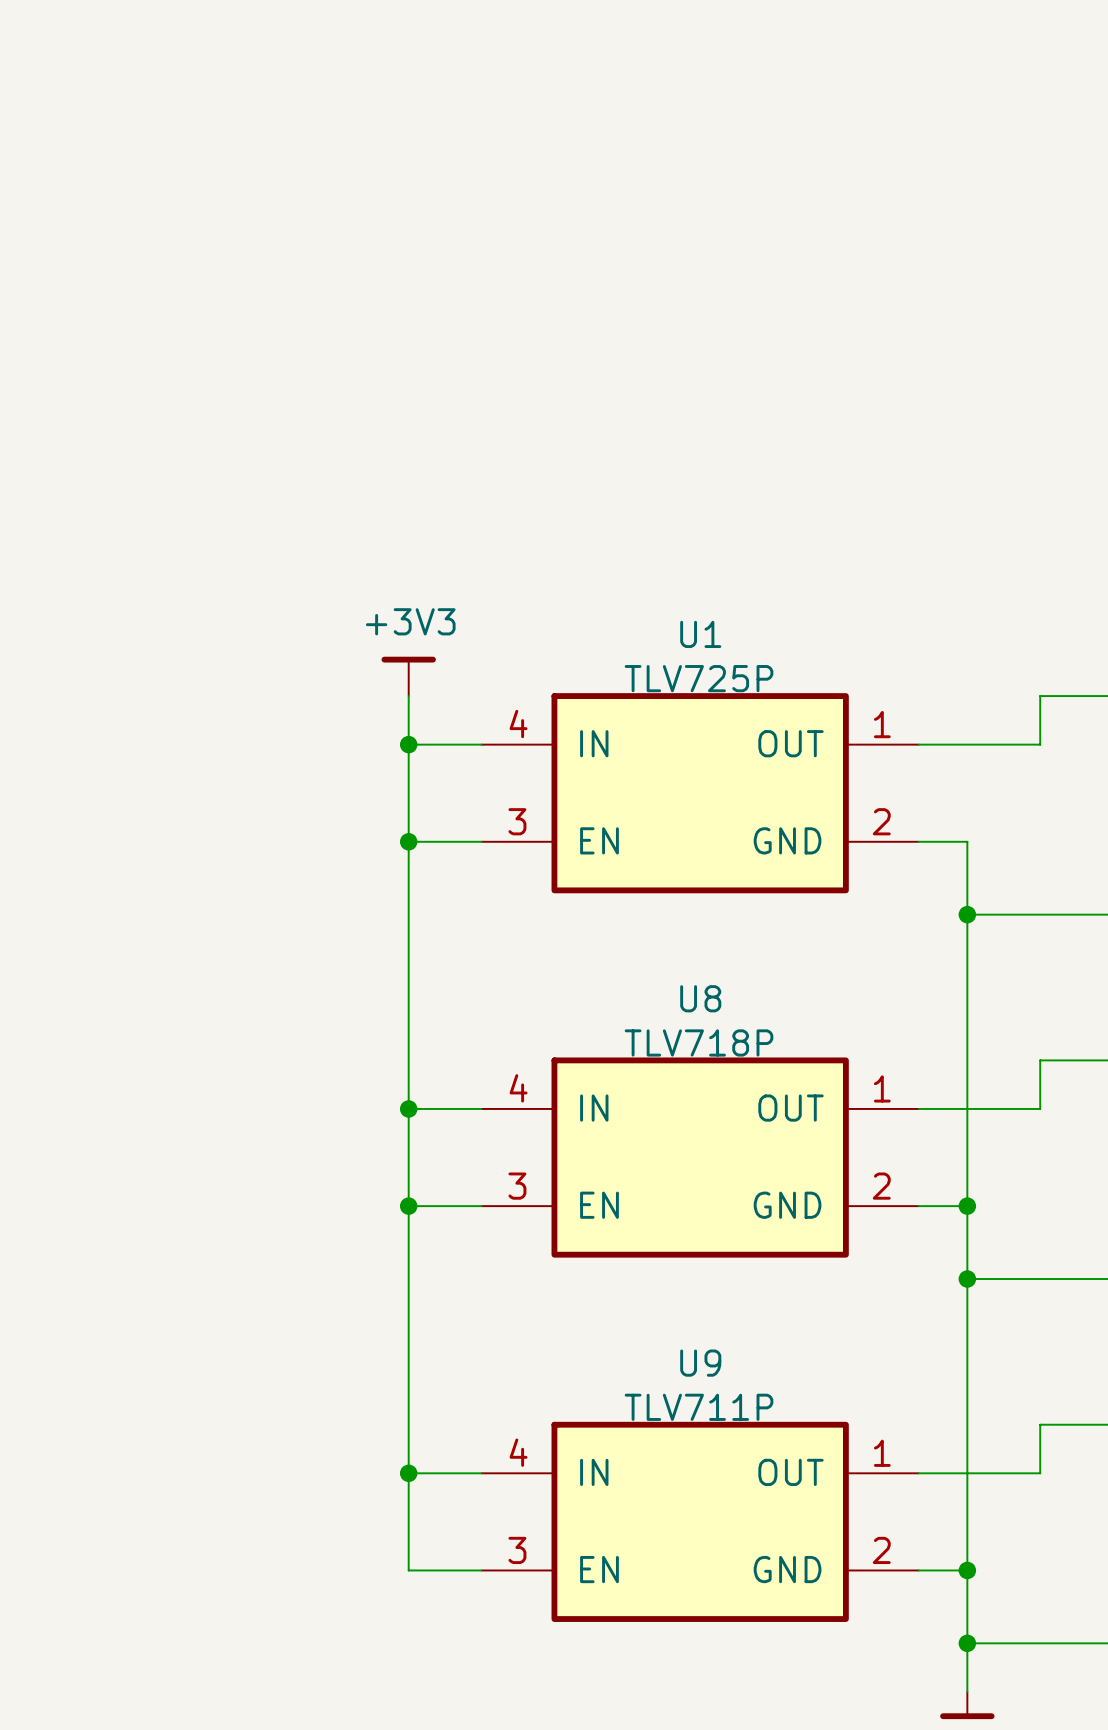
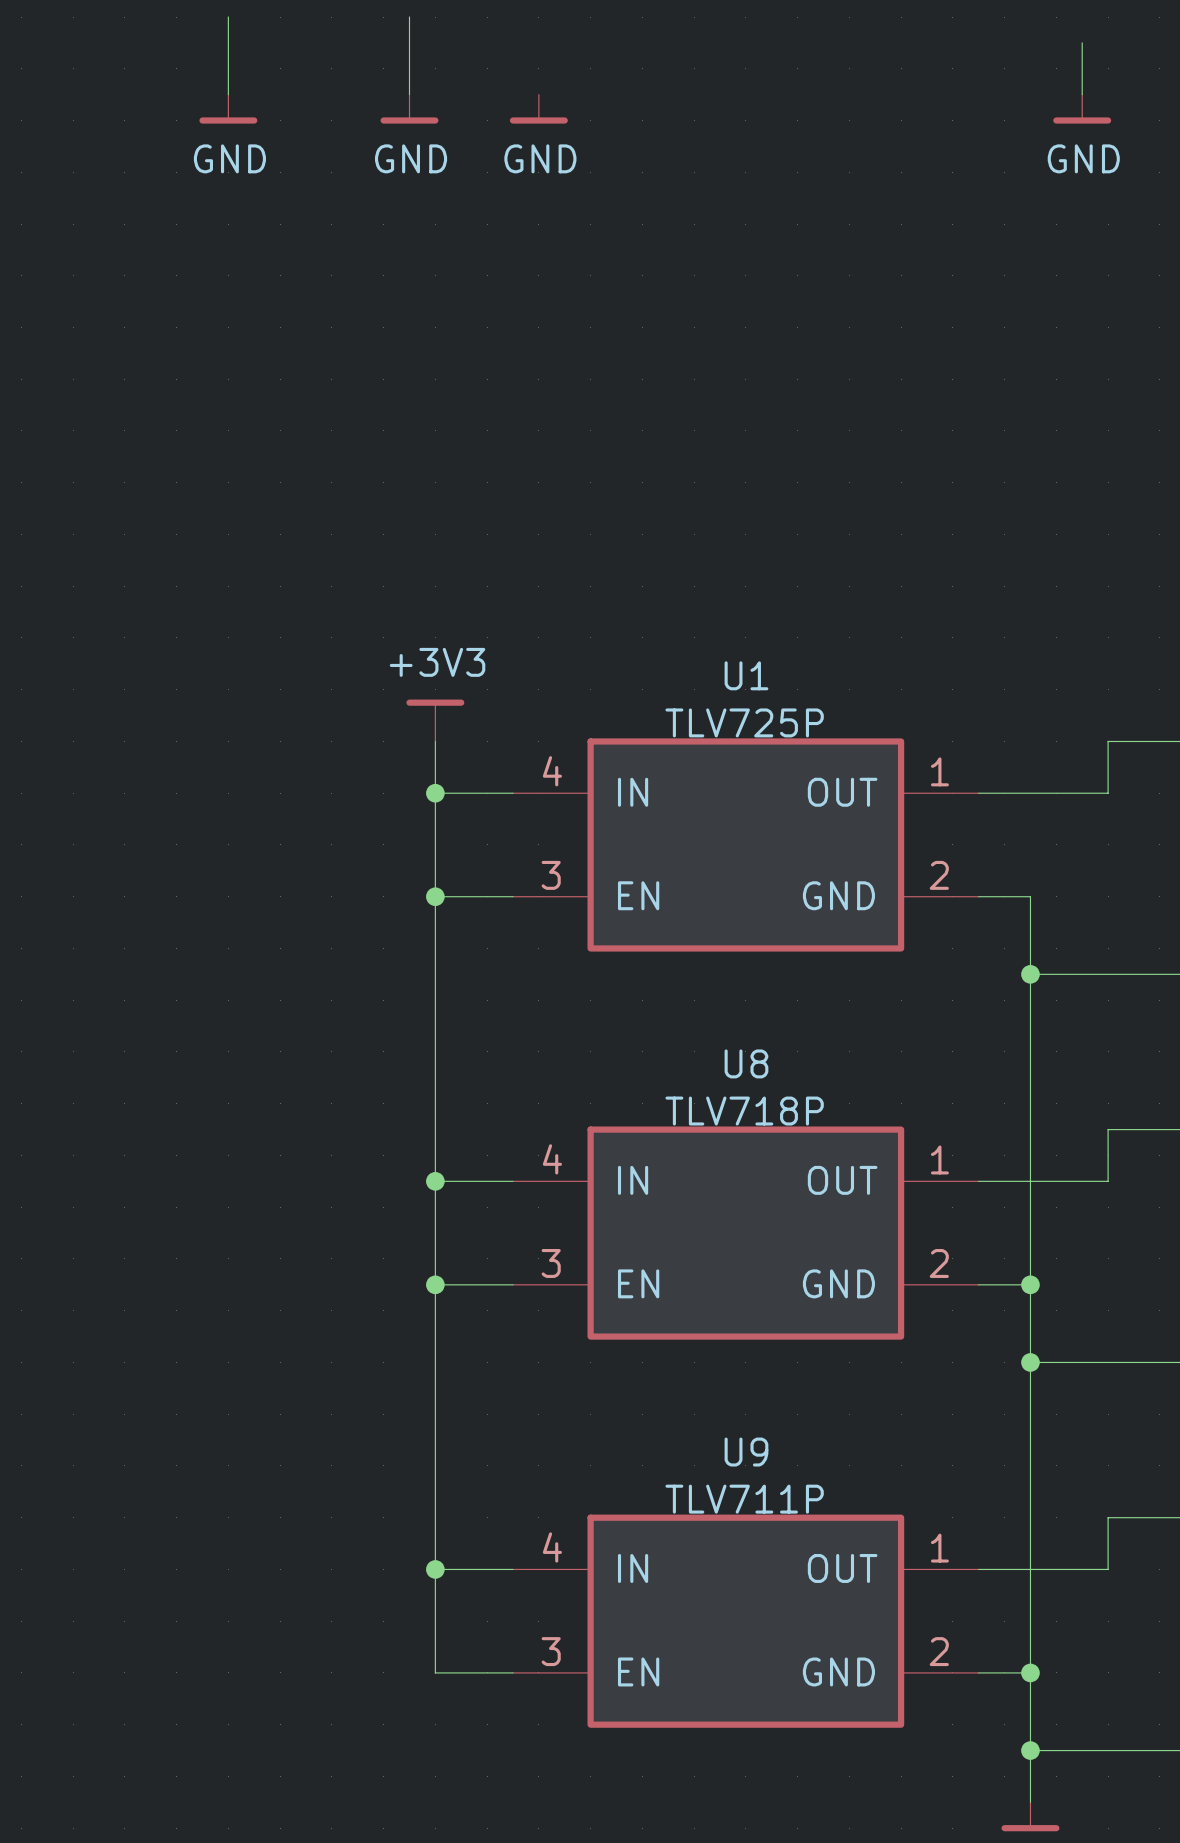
wire: none -> (228, 17) (228, 94)
wire: none -> (409, 17) (409, 94)
wire: none -> (1082, 42) (1082, 94)
power symbol: none -> GND (228, 109)
power symbol: none -> GND (409, 109)
power symbol: none -> GND (538, 109)
power symbol: none -> GND (1082, 109)

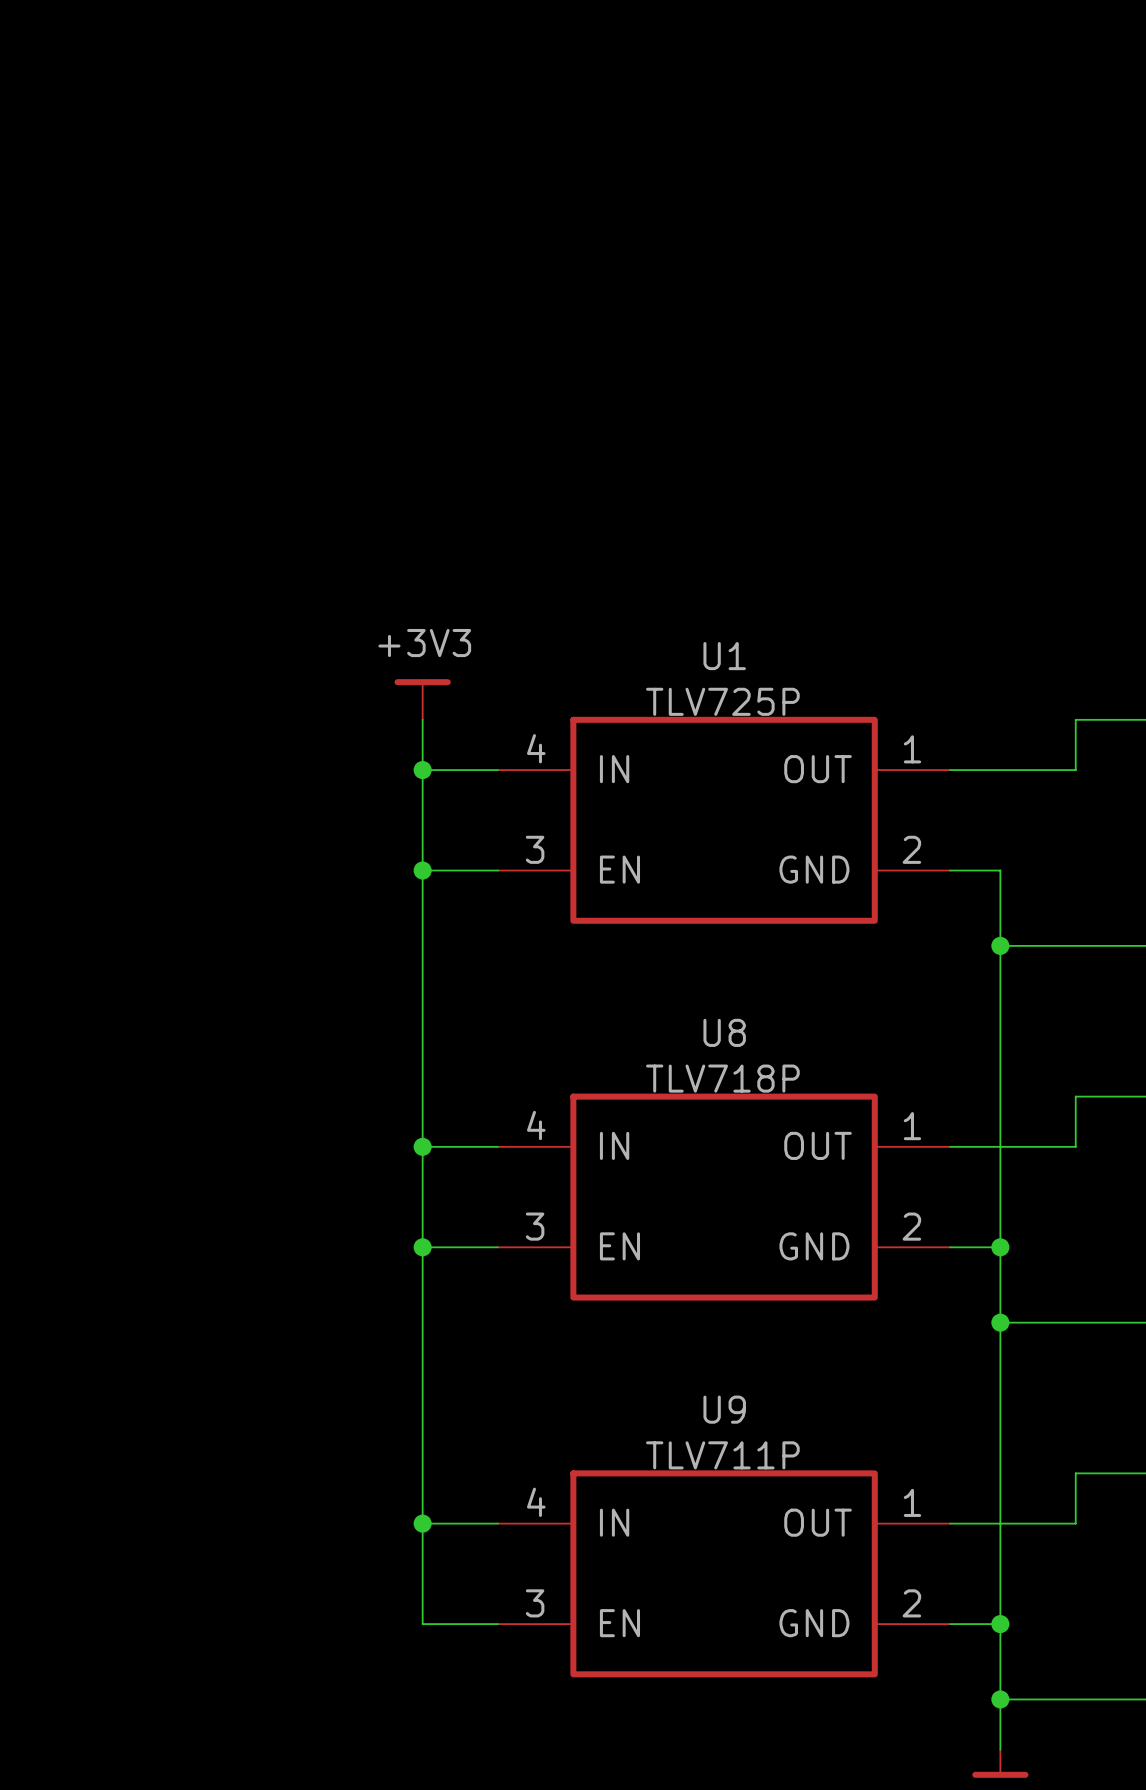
wire: (228, 17) (228, 94) -> none
wire: (409, 17) (409, 94) -> none
wire: (1082, 42) (1082, 94) -> none
power symbol: GND (228, 109) -> none
power symbol: GND (409, 109) -> none
power symbol: GND (538, 109) -> none
power symbol: GND (1082, 109) -> none

